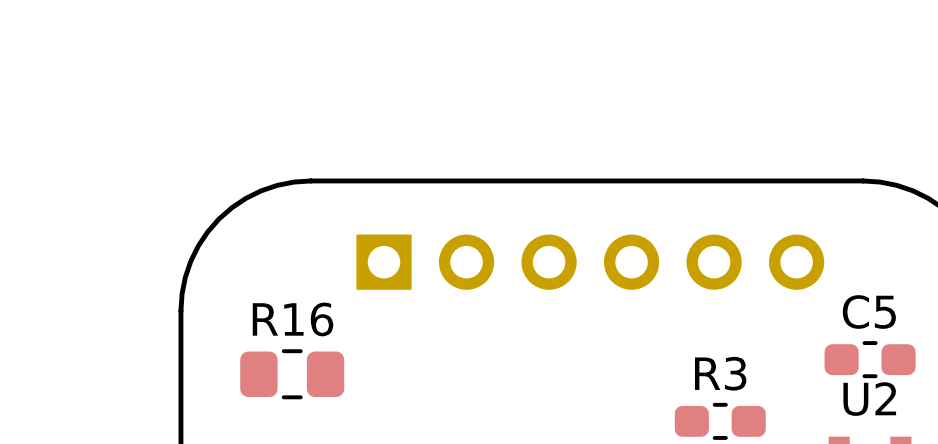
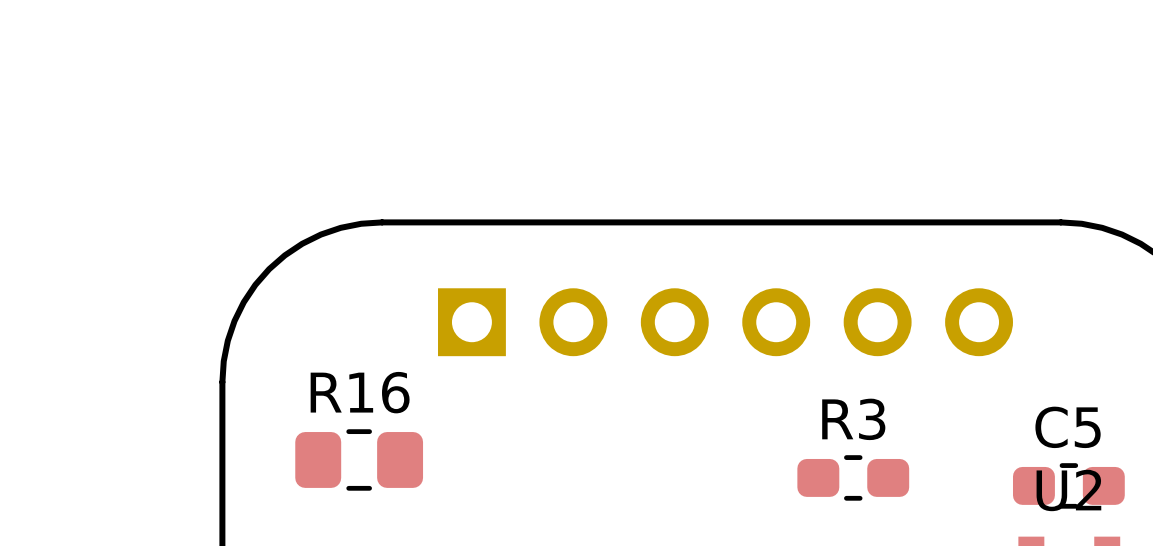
C5 position: (870, 359) -> (1068, 485)
R3 position: (720, 421) -> (853, 477)

